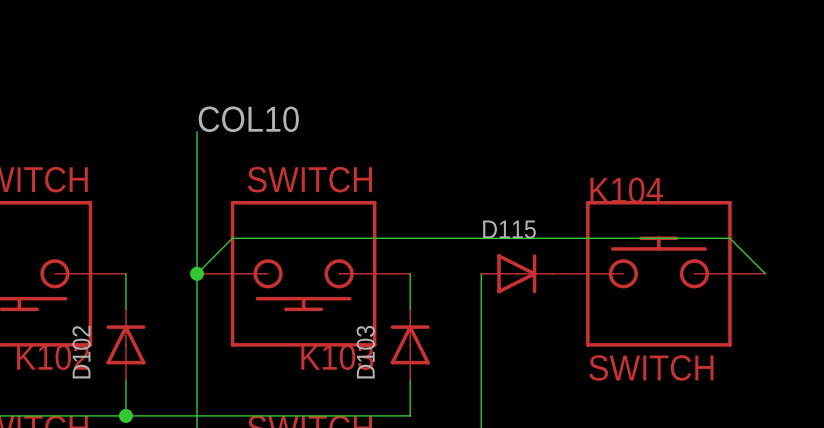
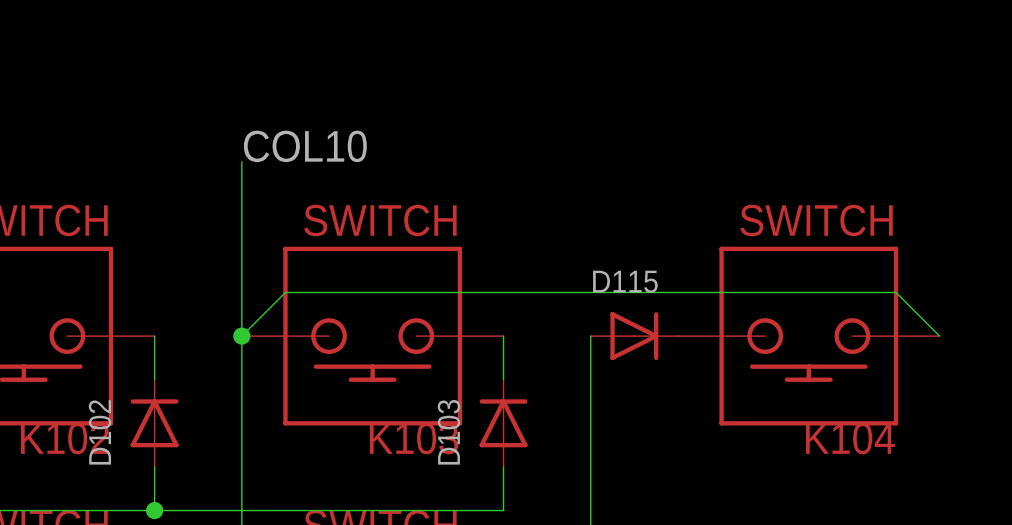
K104 rotation: 0° (658, 273) -> 180° (808, 336)

